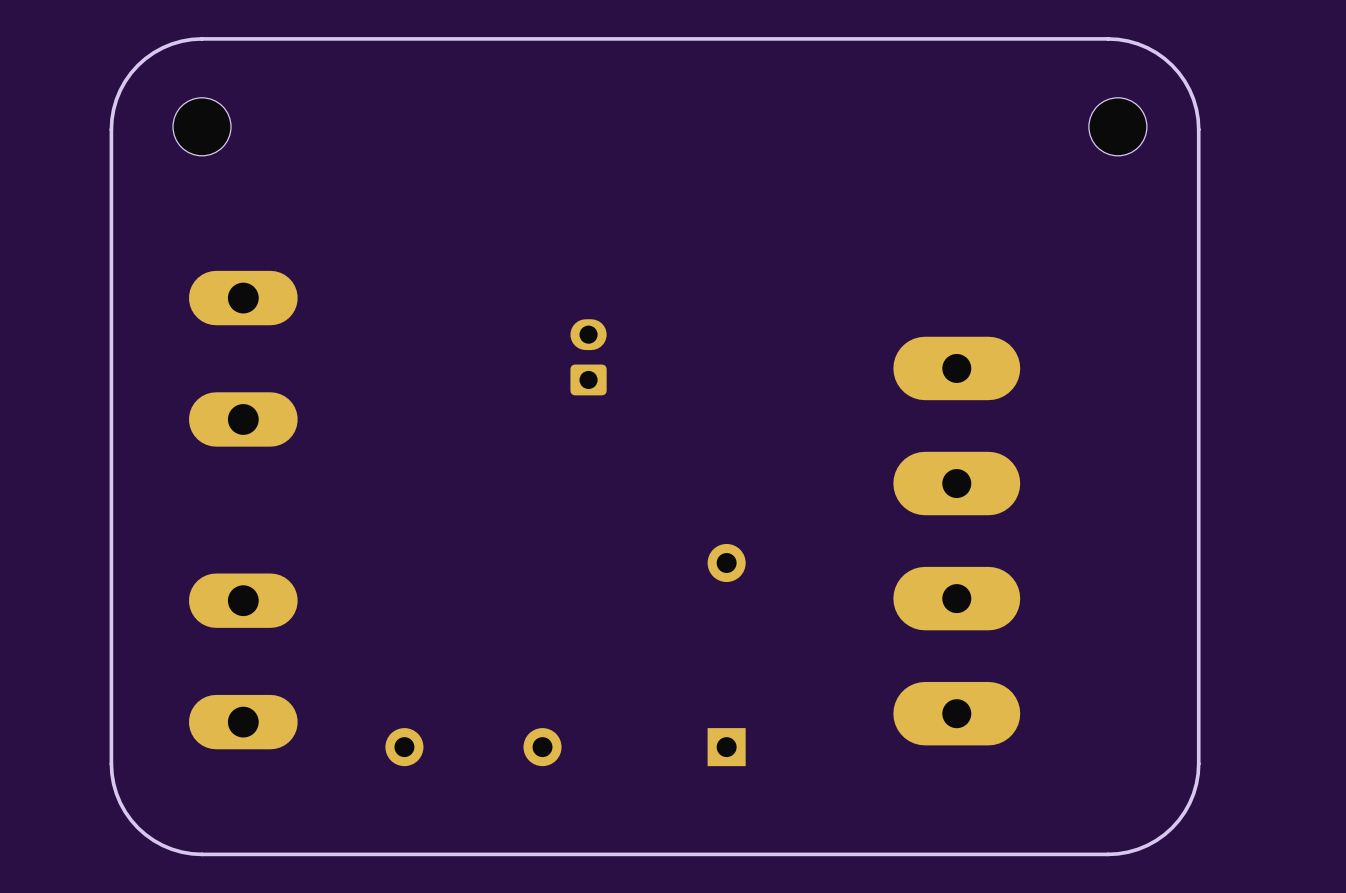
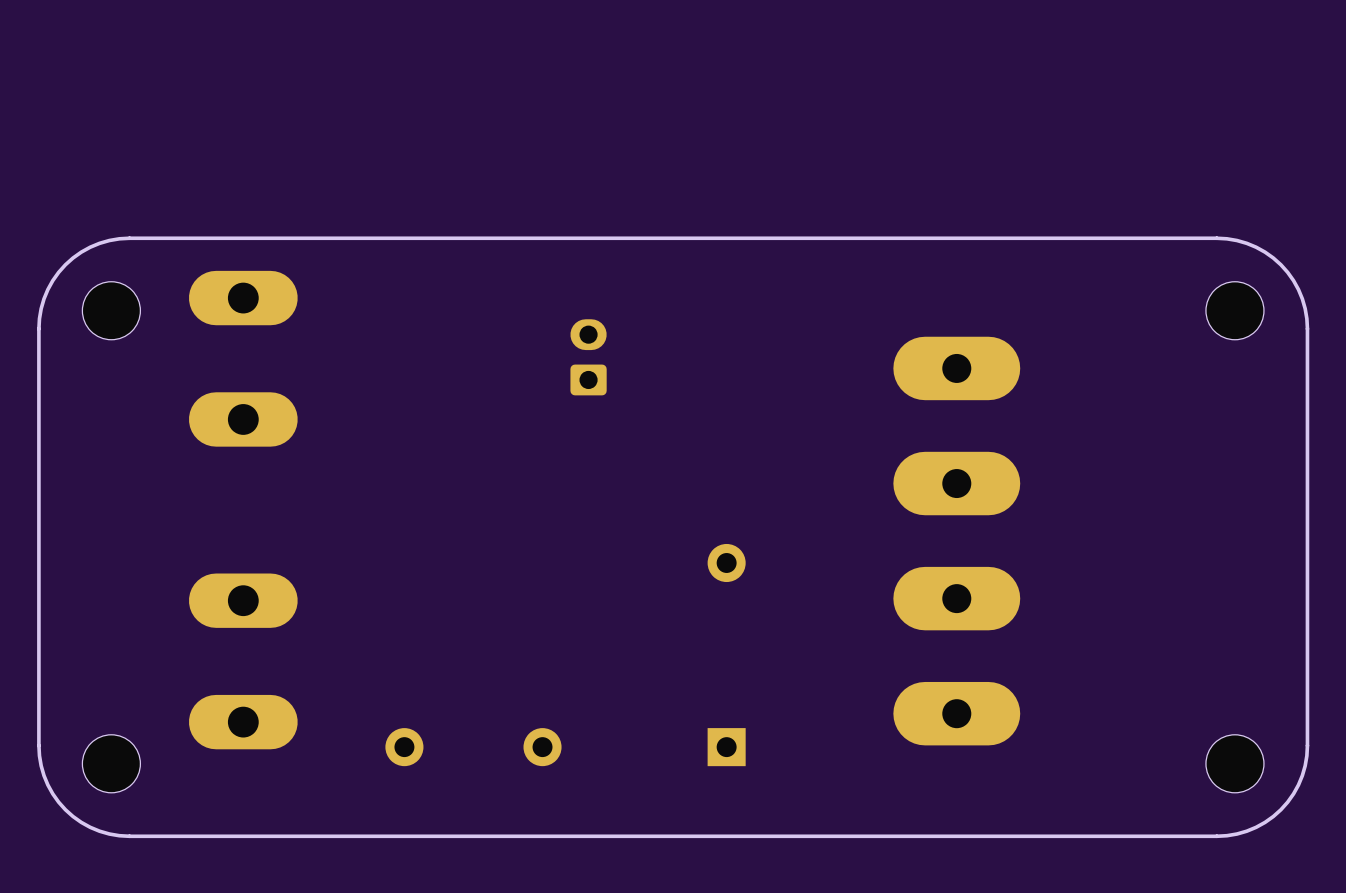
board edge: (1108, 38) (202, 38) (172, 43) (145, 58) (131, 73) (120, 90) (113, 109) (111, 129) (111, 763) (116, 793) (131, 820) (145, 834) (162, 845) (181, 852) (202, 854) (1108, 854) (1138, 849) (1164, 834) (1178, 820) (1189, 803) (1196, 783) (1198, 763) (1198, 119) (1189, 90) (1172, 65) (1156, 52) (1138, 43) (1108, 38) -> (1216, 238) (1246, 243) (1265, 252) (1280, 264) (1298, 289) (1306, 318) (1306, 755) (1302, 775) (1293, 793) (1280, 809) (1256, 827) (1237, 834) (1216, 836) (129, 836) (109, 834) (81, 822) (65, 809) (47, 784) (41, 765) (38, 745) (39, 318) (43, 298) (58, 272) (73, 258) (90, 247) (109, 240) (129, 238) (1216, 238)
part position: (202, 126) -> (111, 310)
part position: (1117, 126) -> (1234, 310)
part: none -> (111, 763)
part: none -> (1234, 763)

